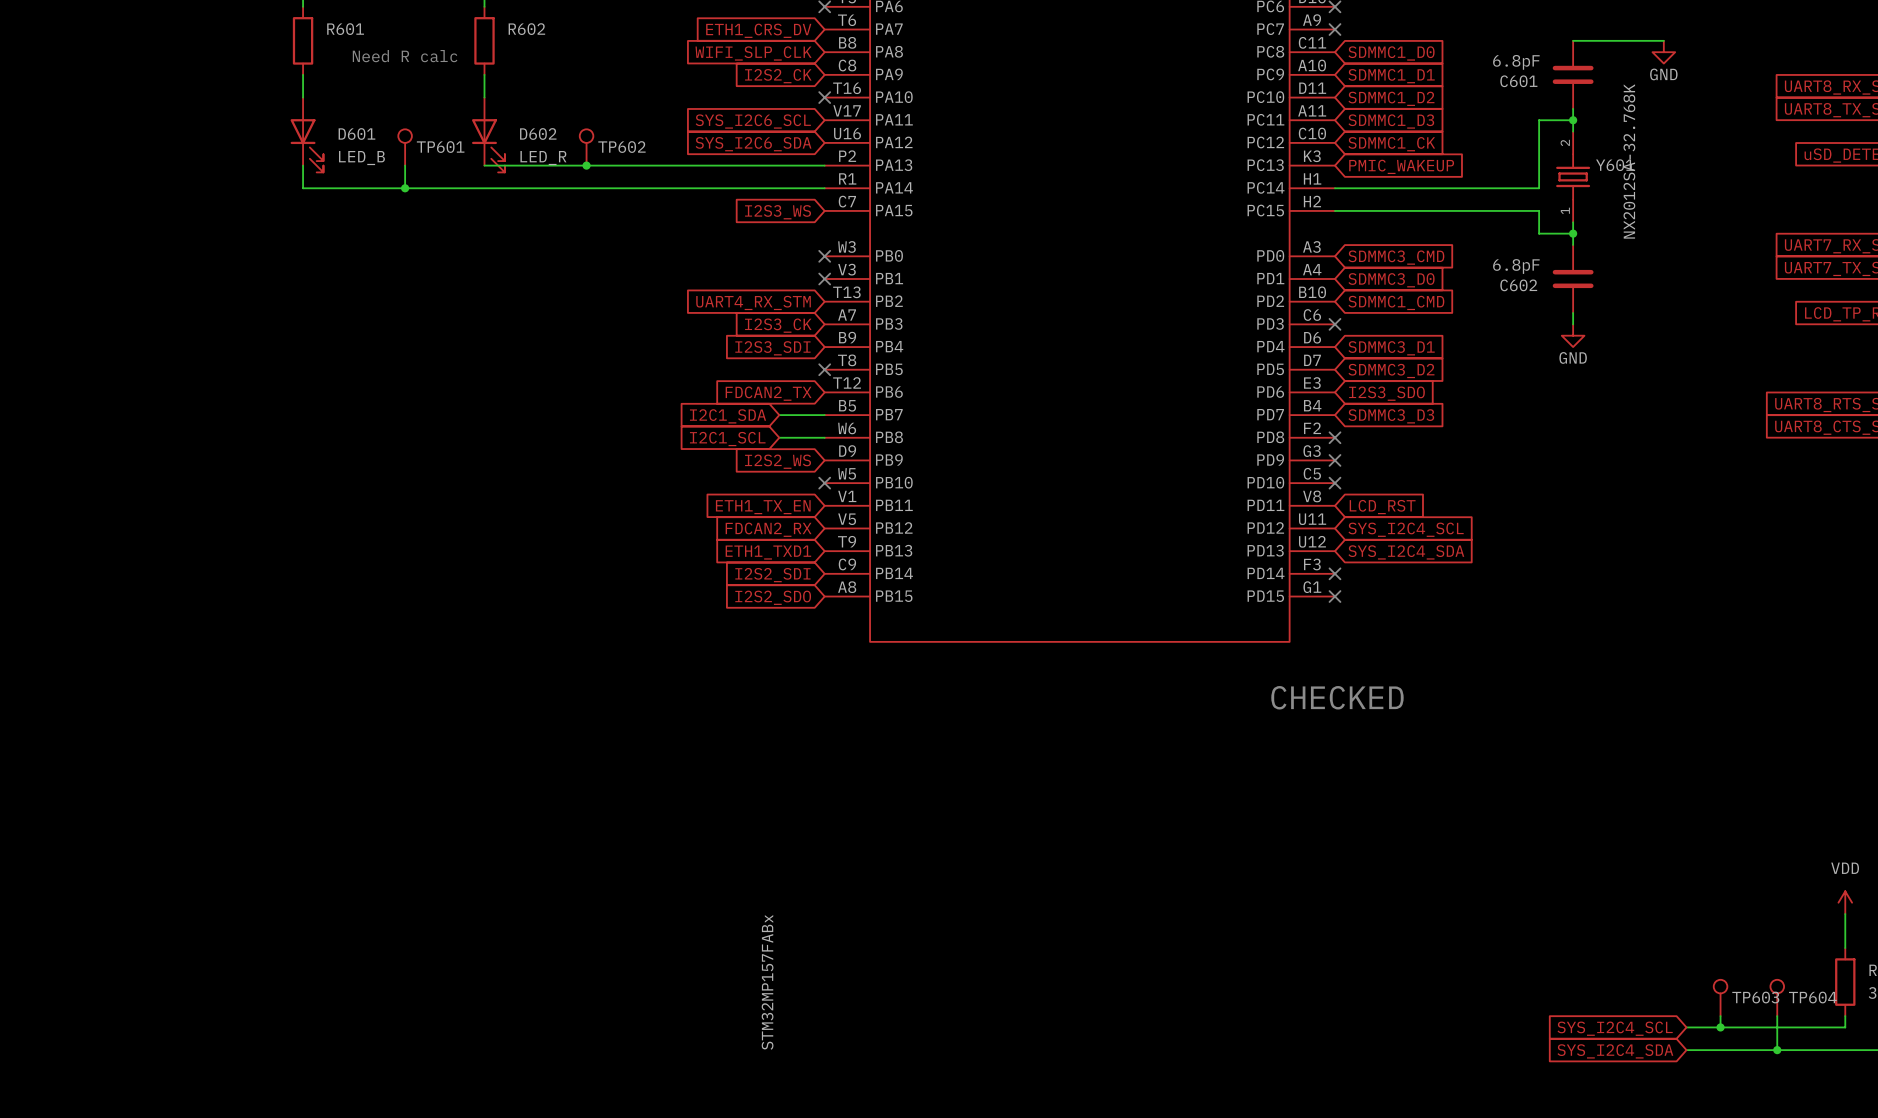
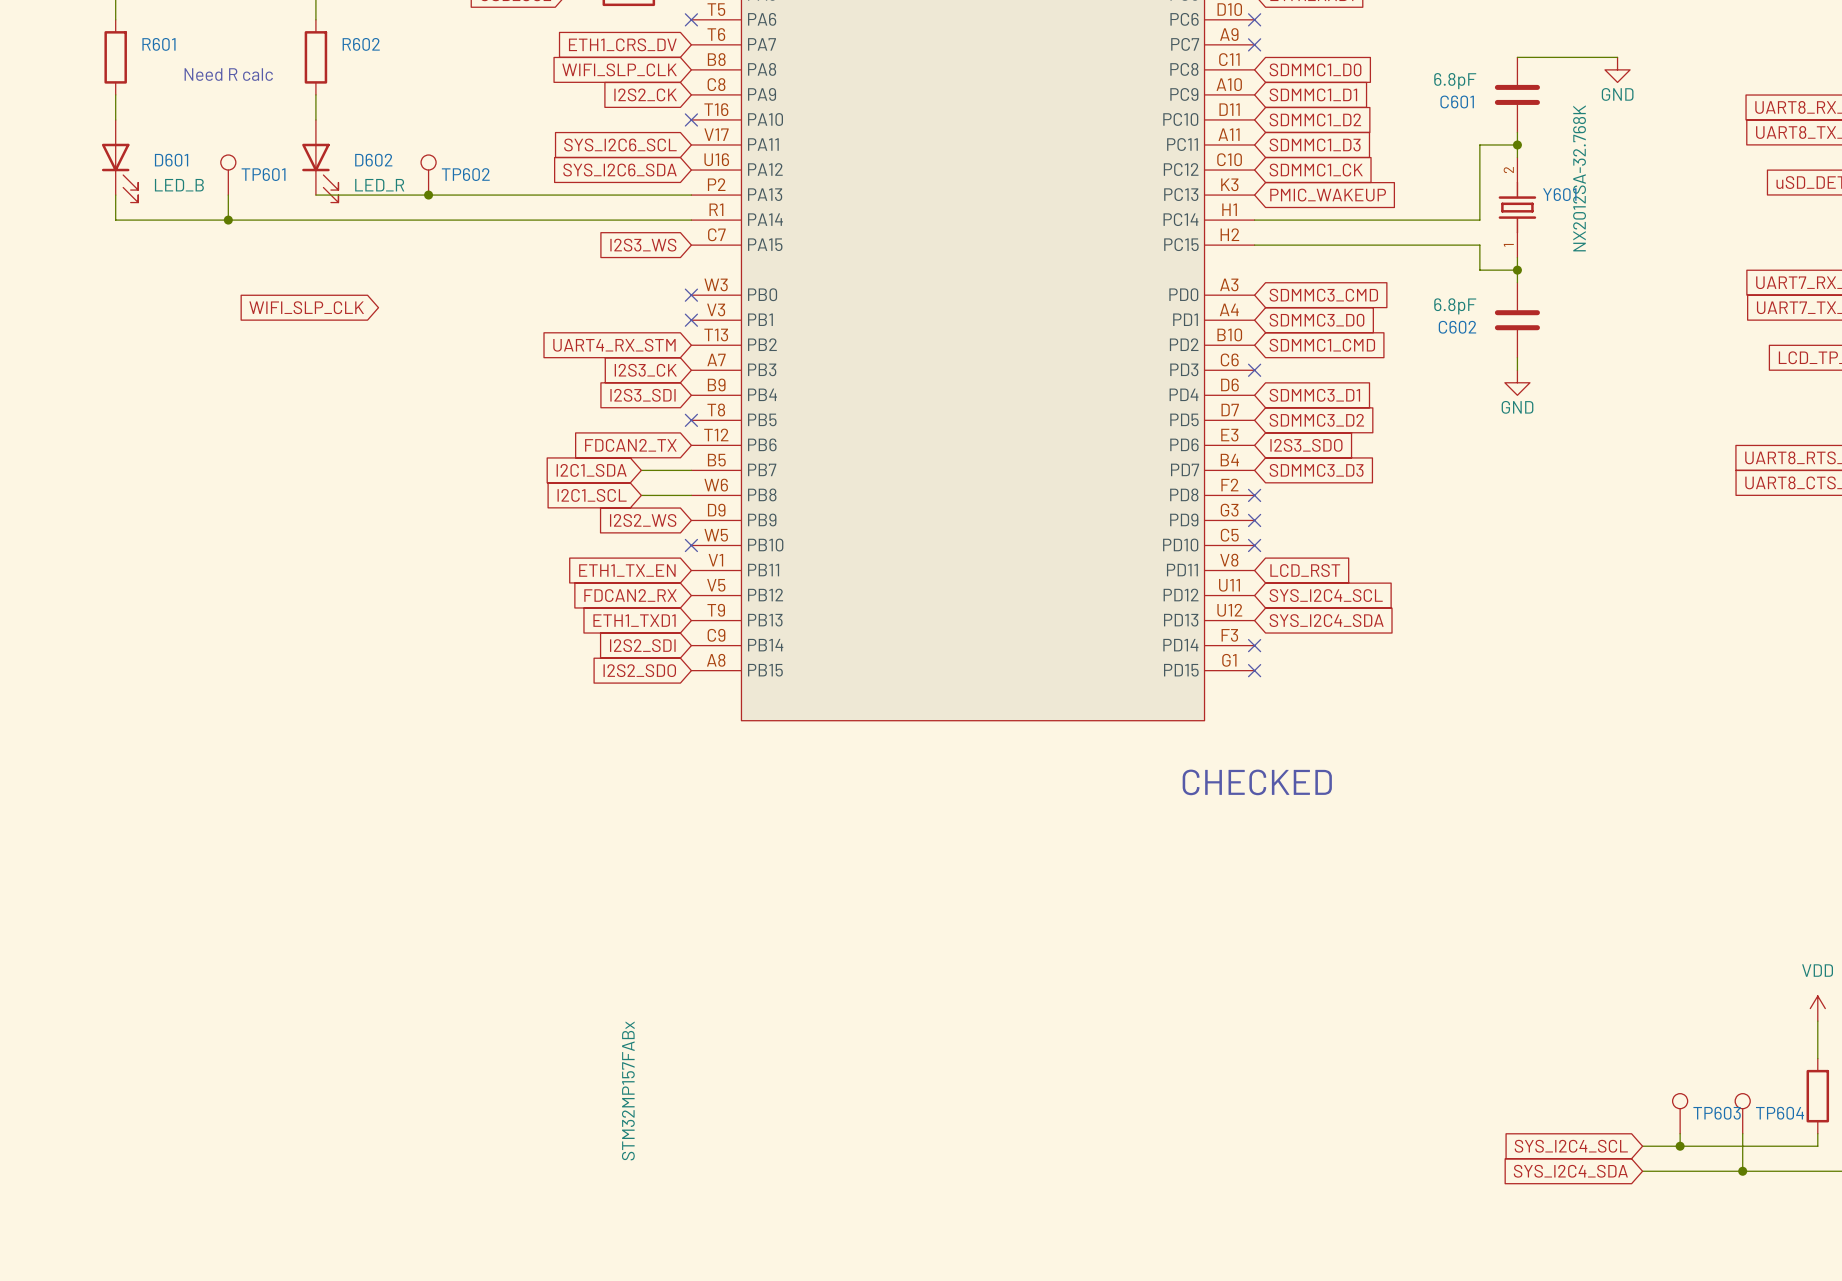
global label: none -> WIFI_SLP_CLK (306, 307)

